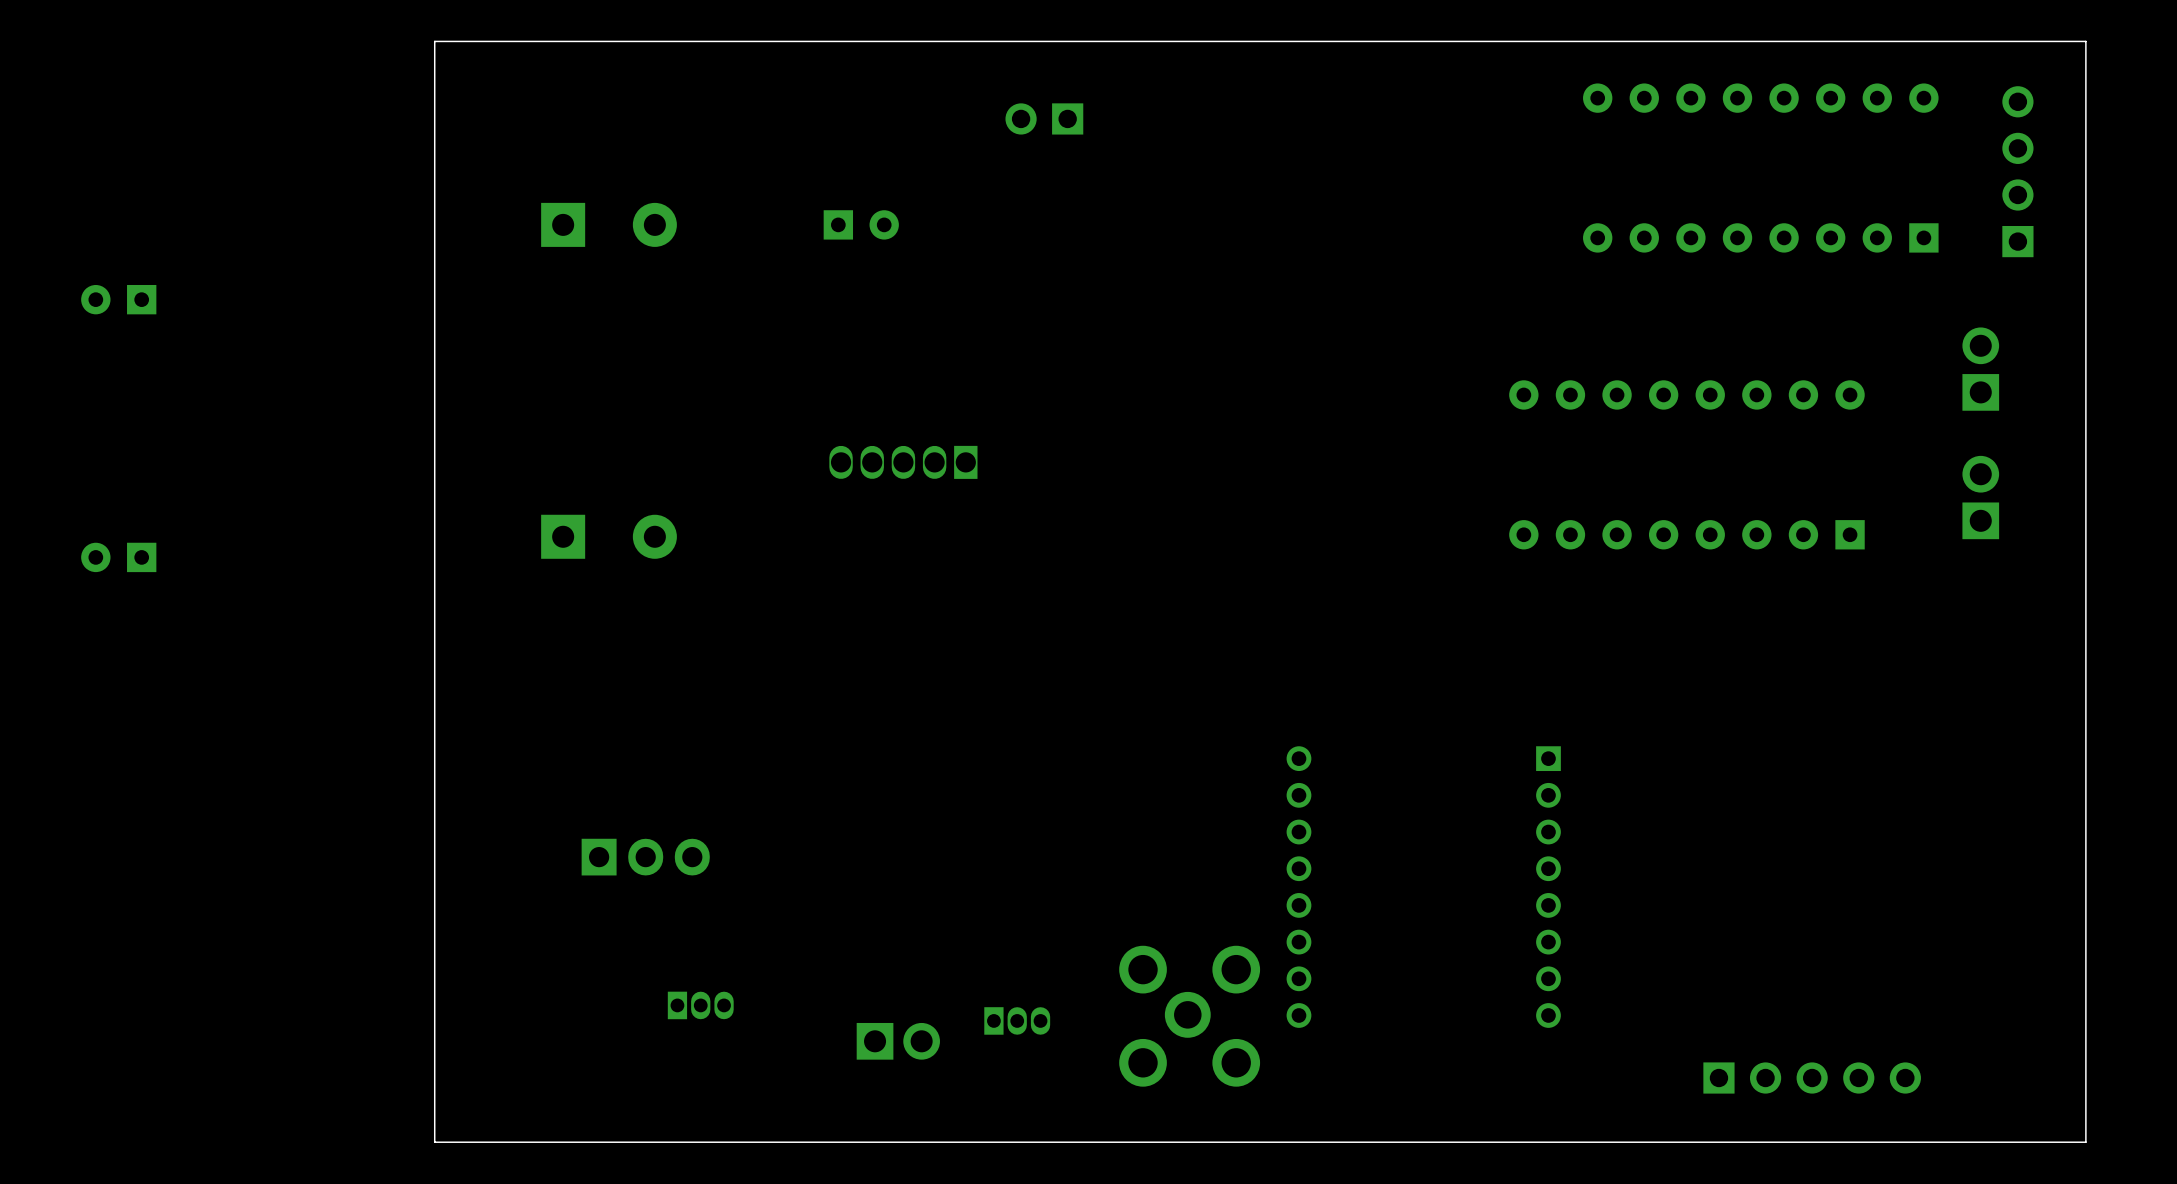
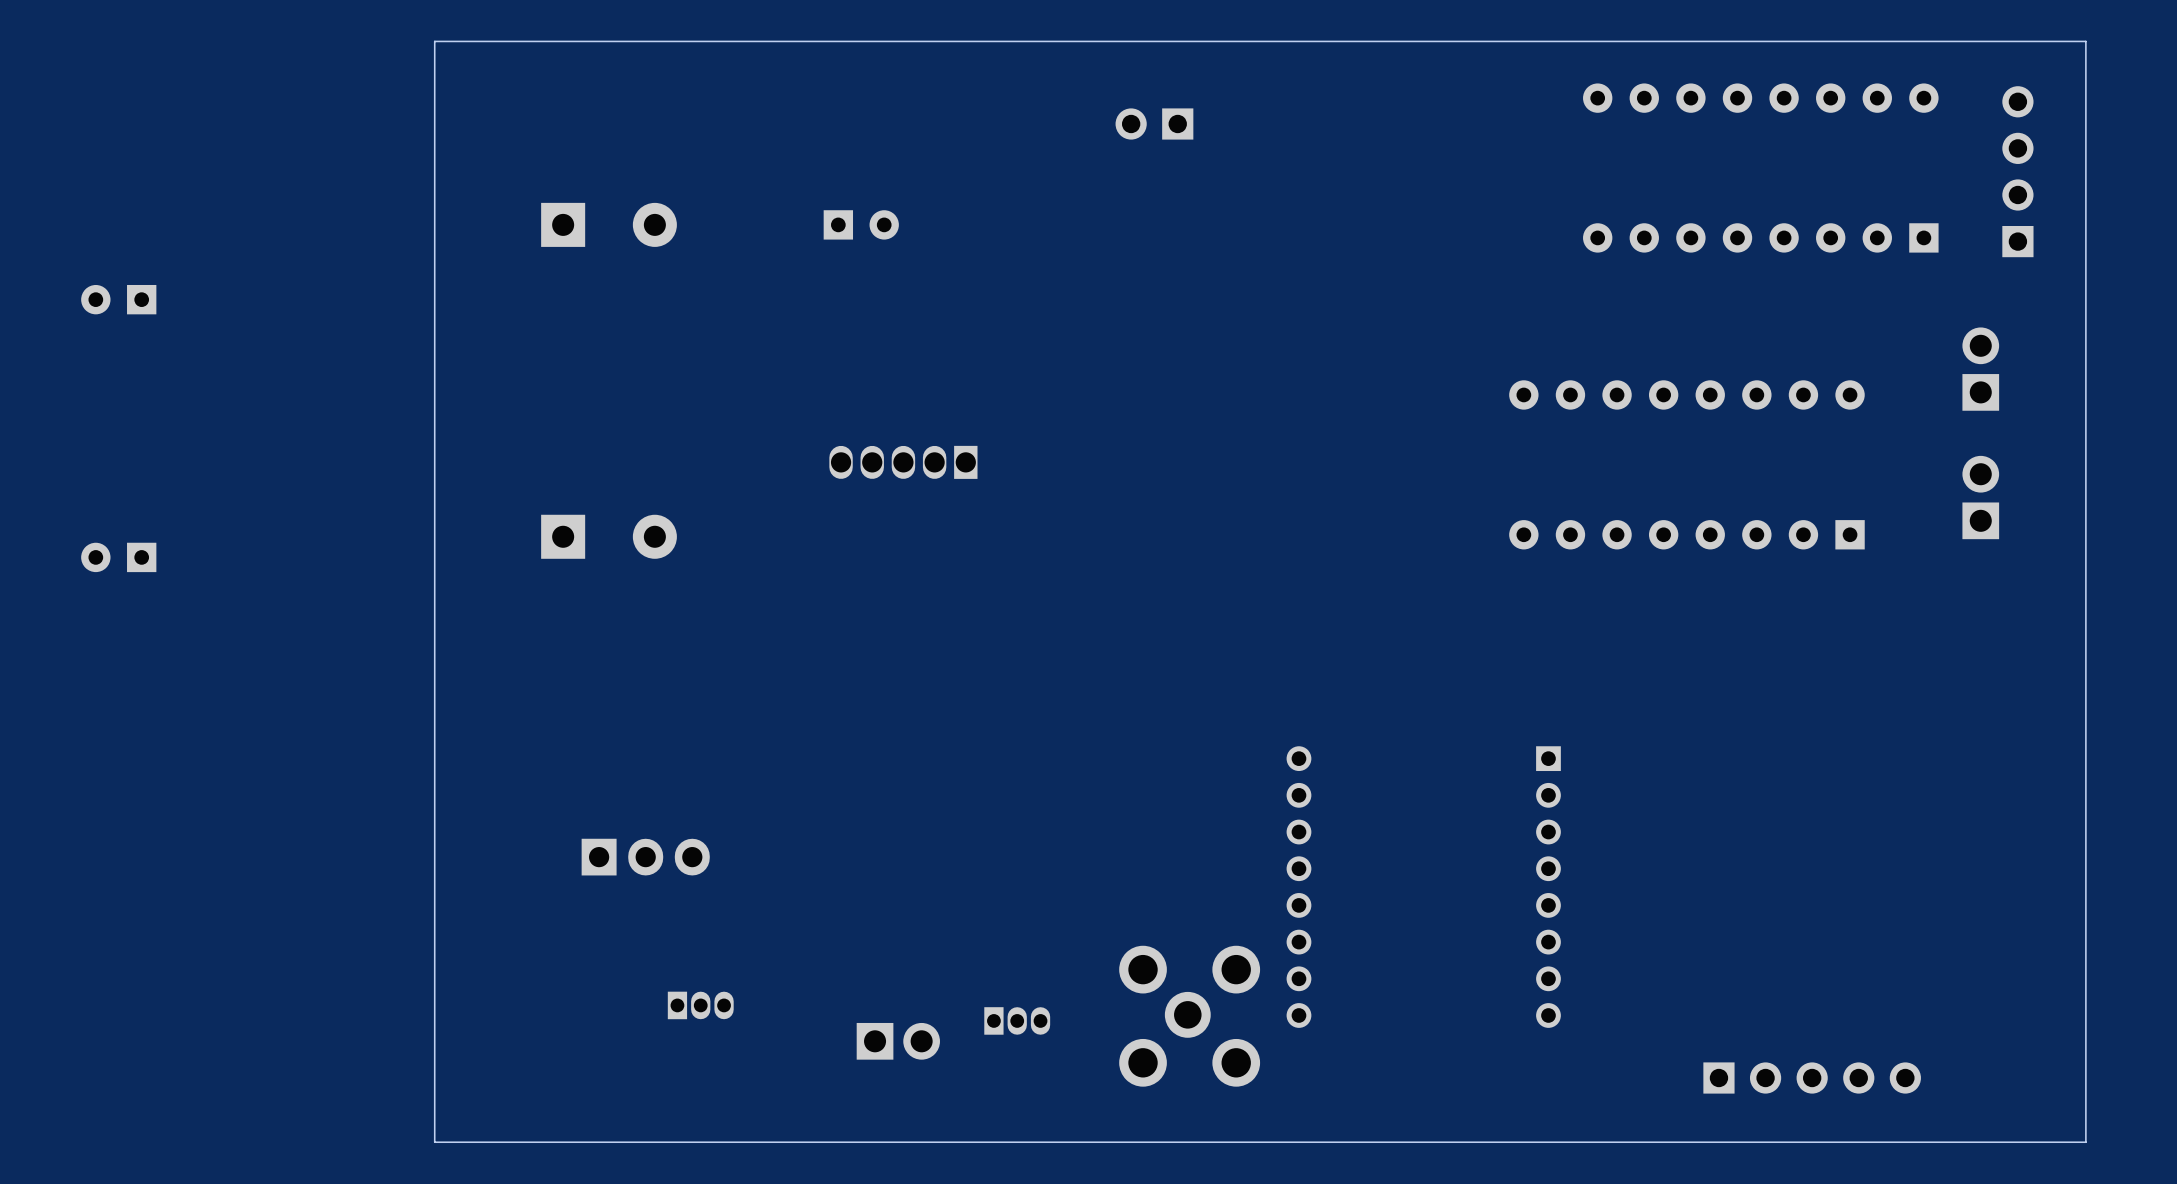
part position: (1044, 118) -> (1154, 123)

